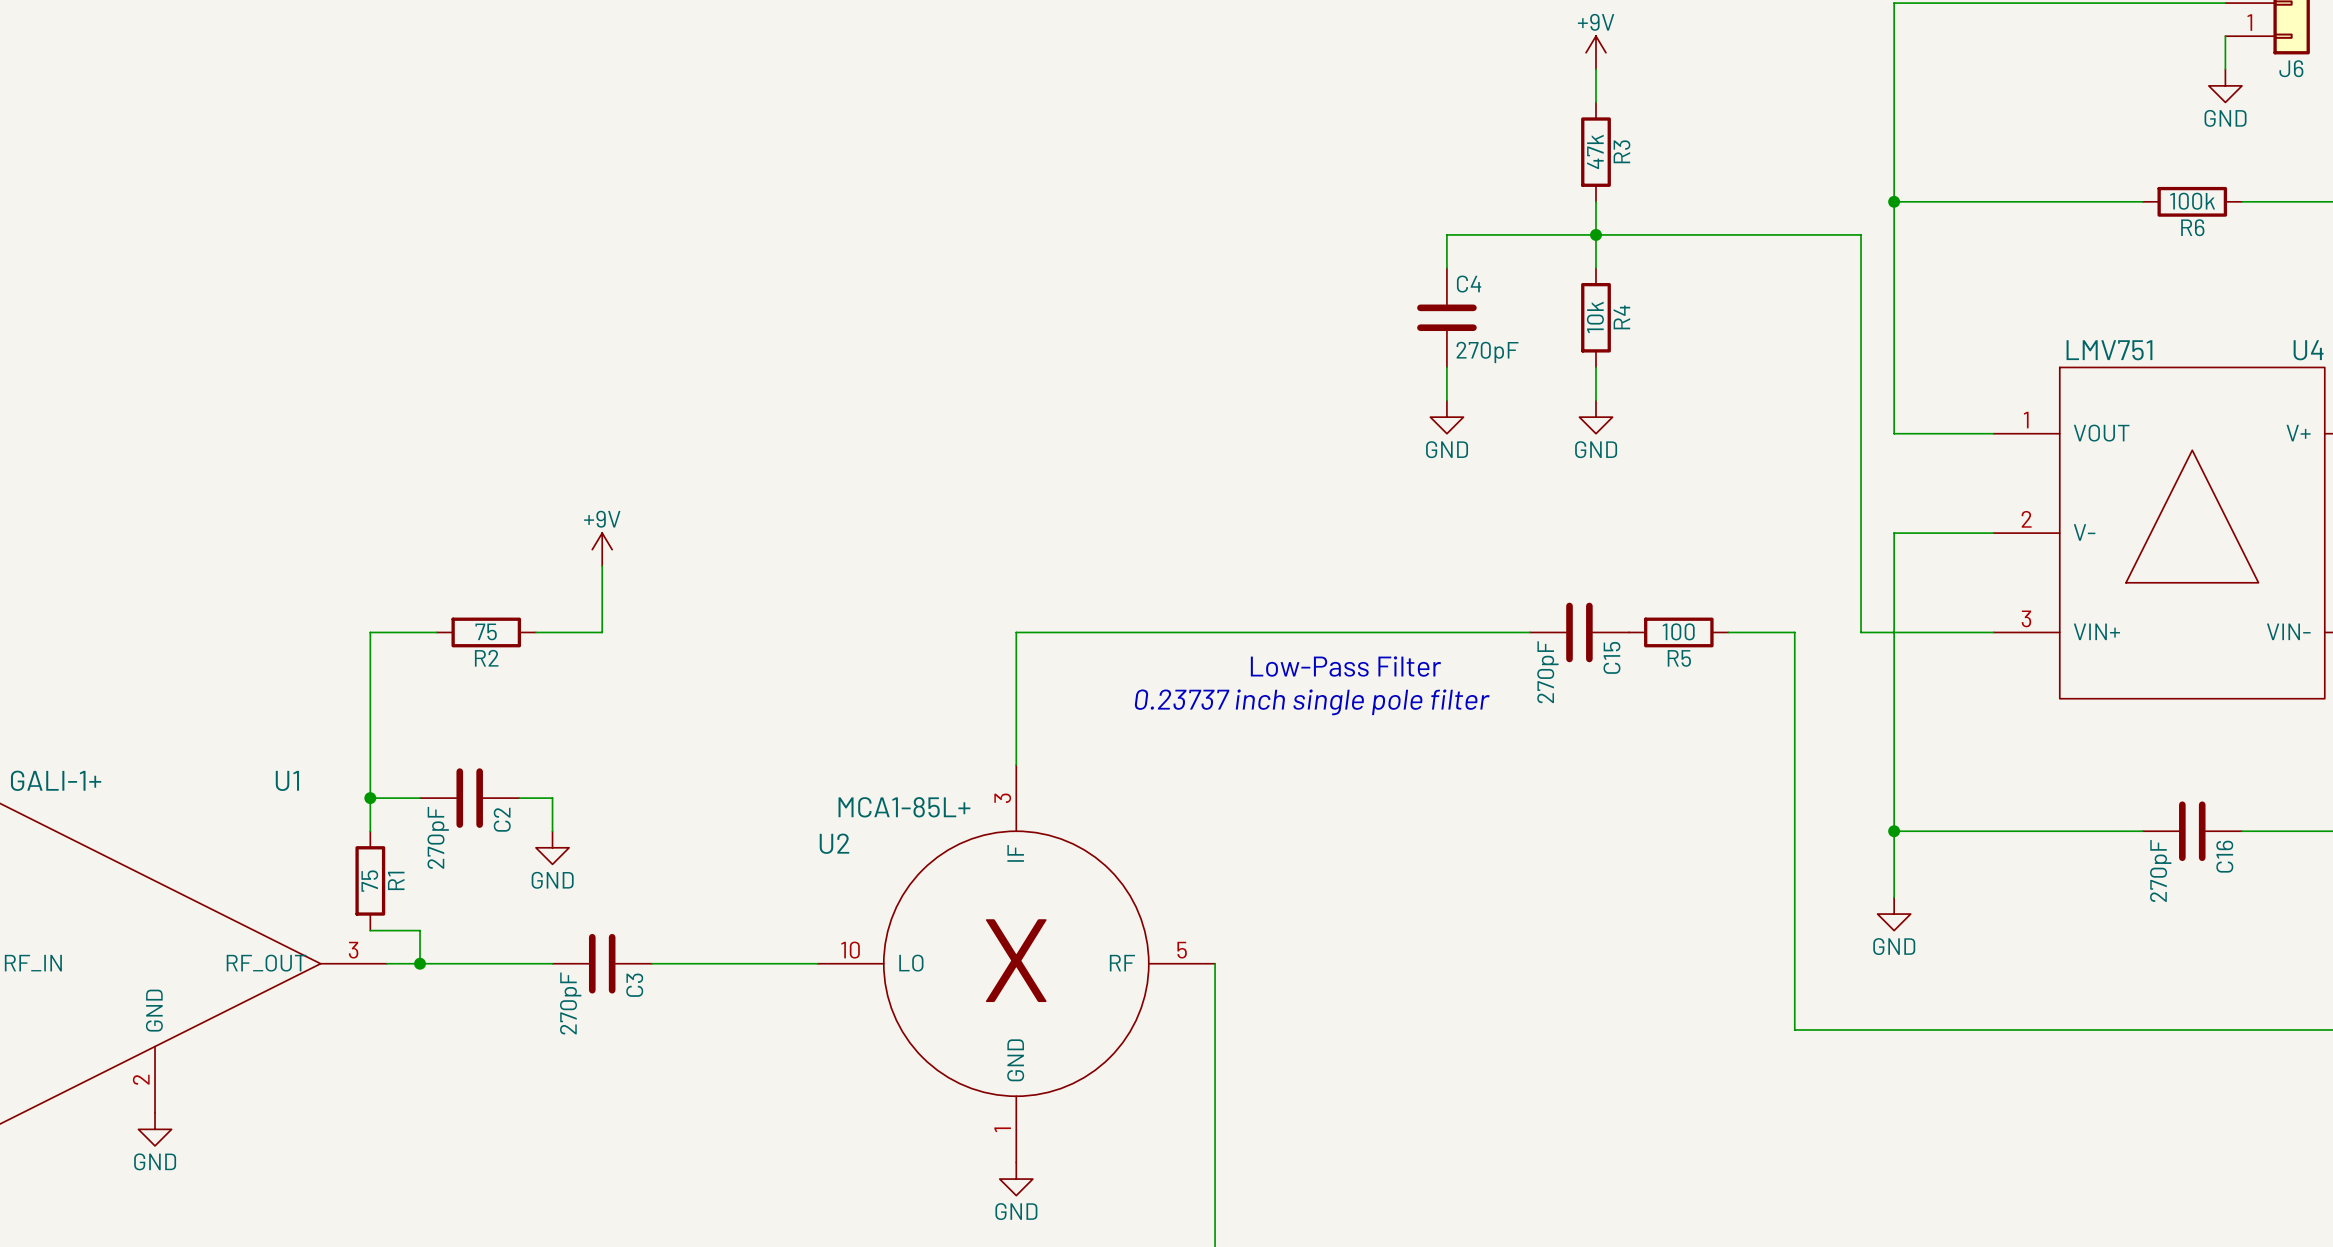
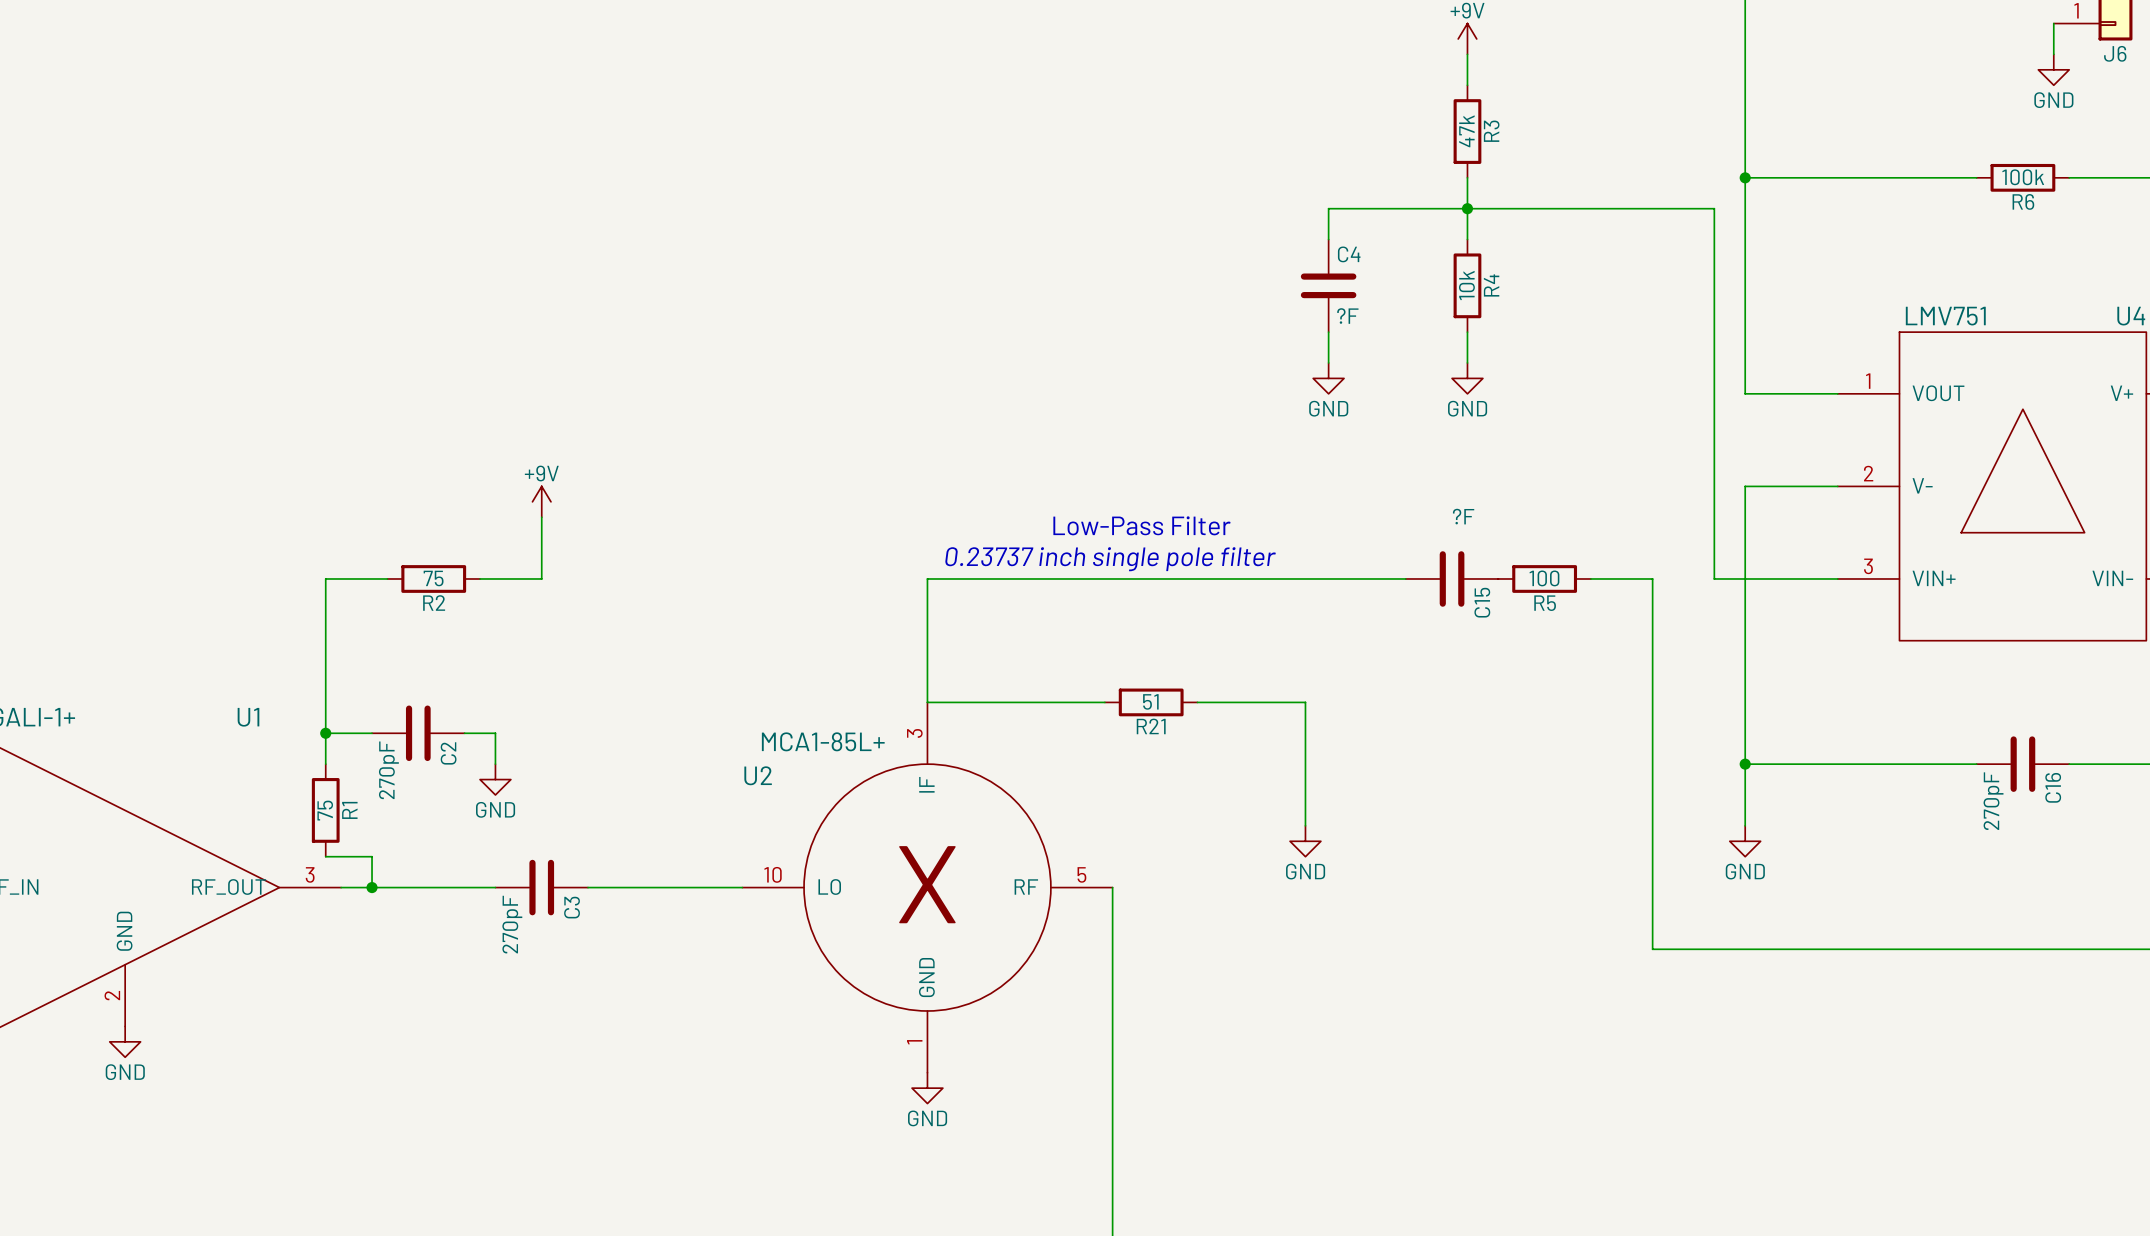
C4 value: 270pF (1487, 352) -> ?F (1347, 316)
text position: Low-Pass Filter (1345, 666) -> Low-Pass Filter (1141, 525)
C15 value: 270pF (1547, 672) -> ?F (1463, 516)
text position: 0.23737 inch single pole filter (1312, 702) -> 0.23737 inch single pole filter (1110, 559)
wire: none -> (927, 702) (1104, 702)
R21: none -> 51 (1151, 702)
wire: none -> (1197, 702) (1305, 702) (1305, 825)
power symbol: none -> GND (1305, 841)

